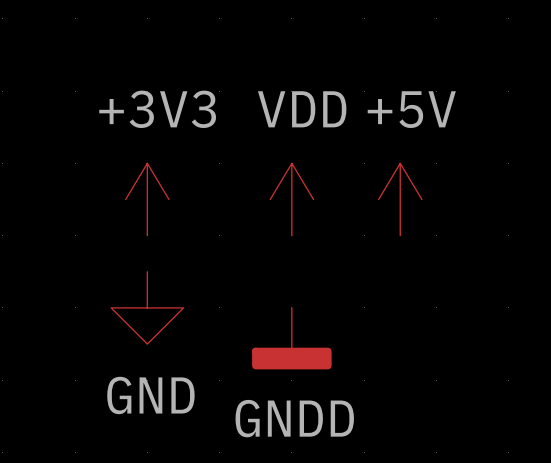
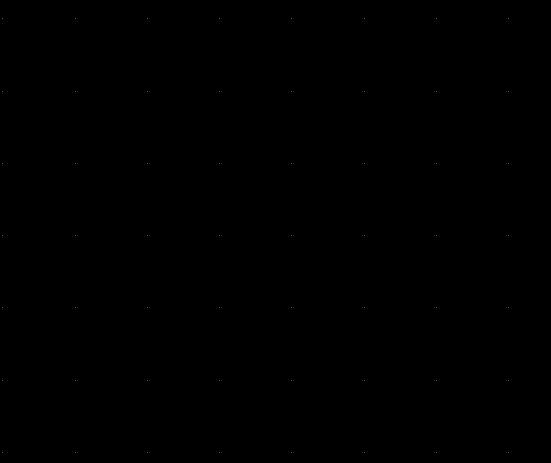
power symbol: +3V3 (147, 199) -> none
power symbol: VDD (291, 199) -> none
power symbol: +5V (400, 199) -> none
power symbol: GND (147, 307) -> none
power symbol: GNDD (291, 338) -> none

